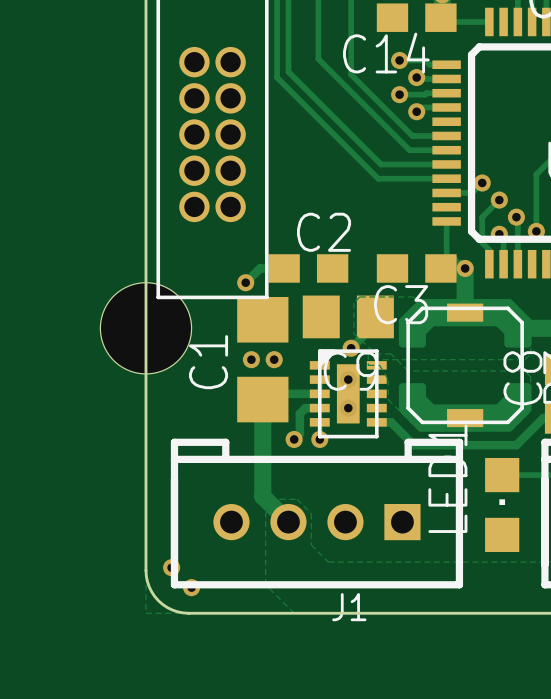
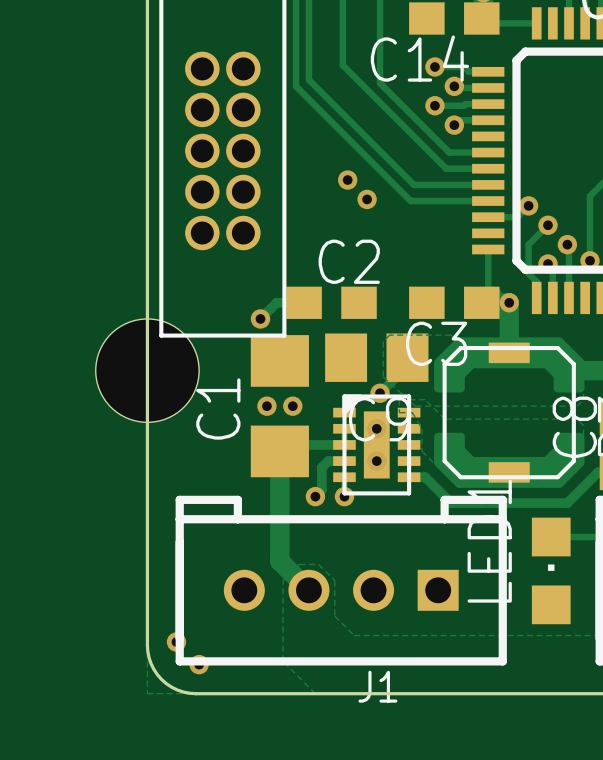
via: none -> (347, 180)
via: none -> (367, 199)

